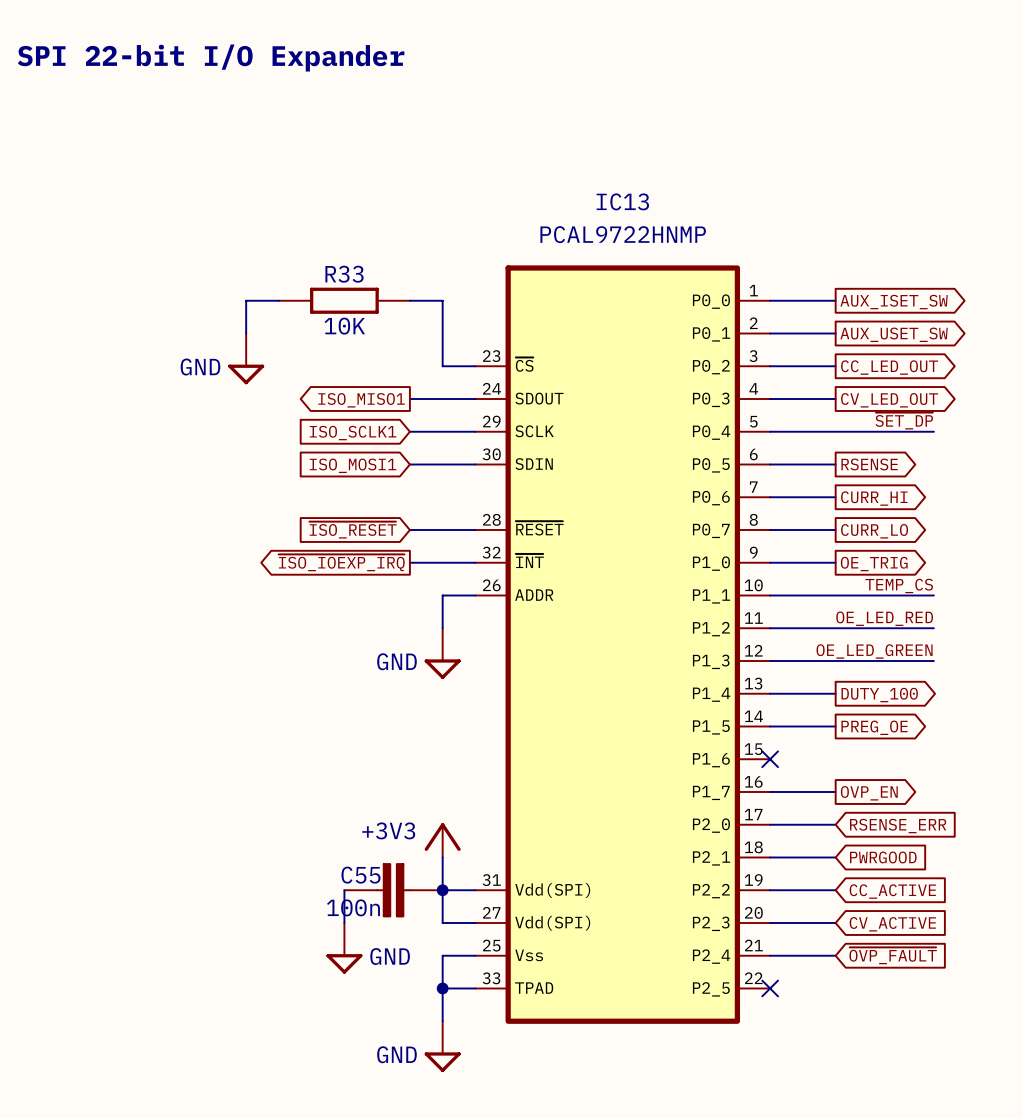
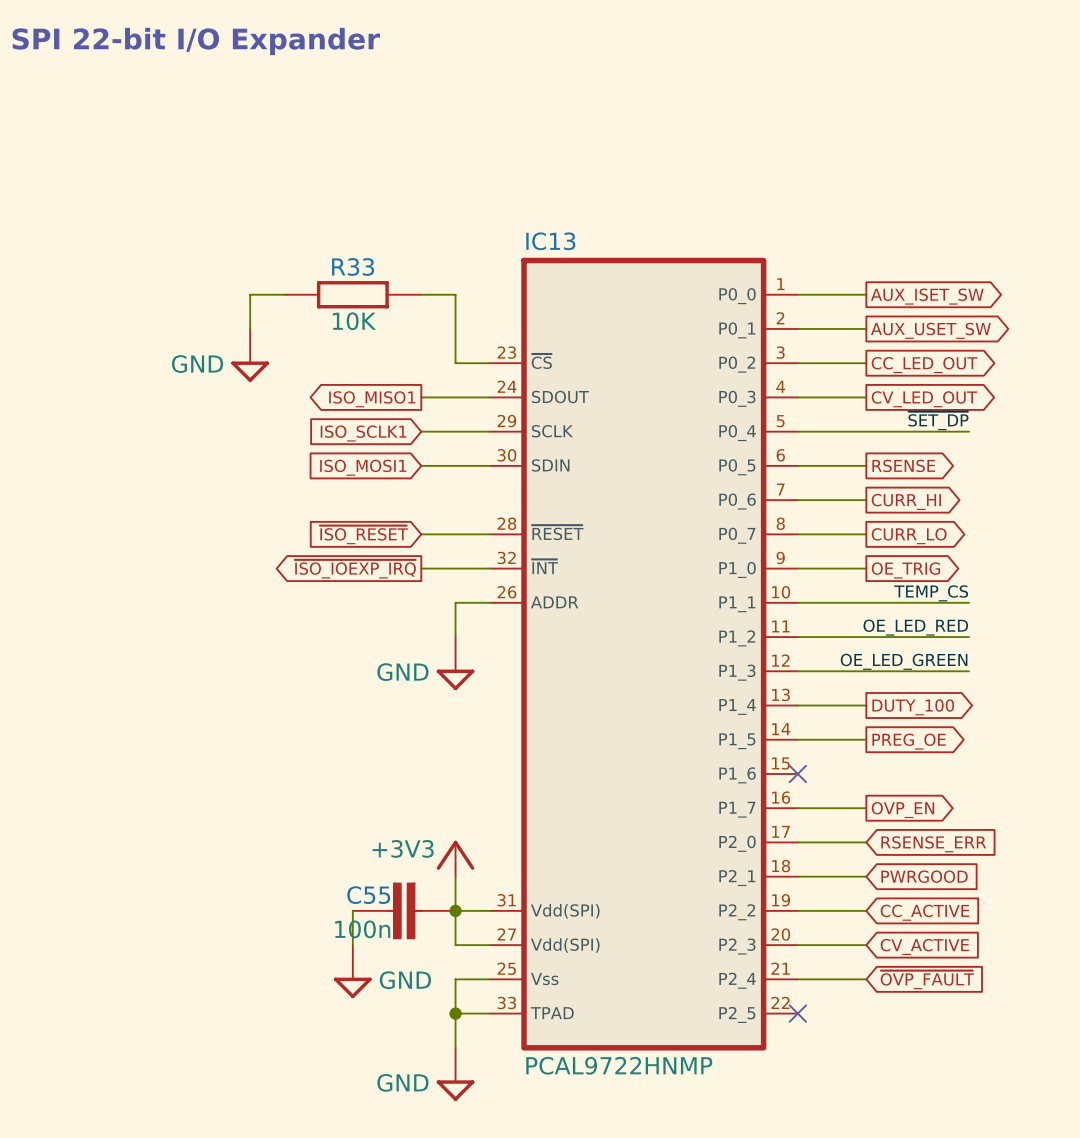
IC13 name position: IC13 (622, 201) -> IC13 (550, 241)
IC13 value position: PCAL9722HNMP (623, 234) -> PCAL9722HNMP (619, 1065)

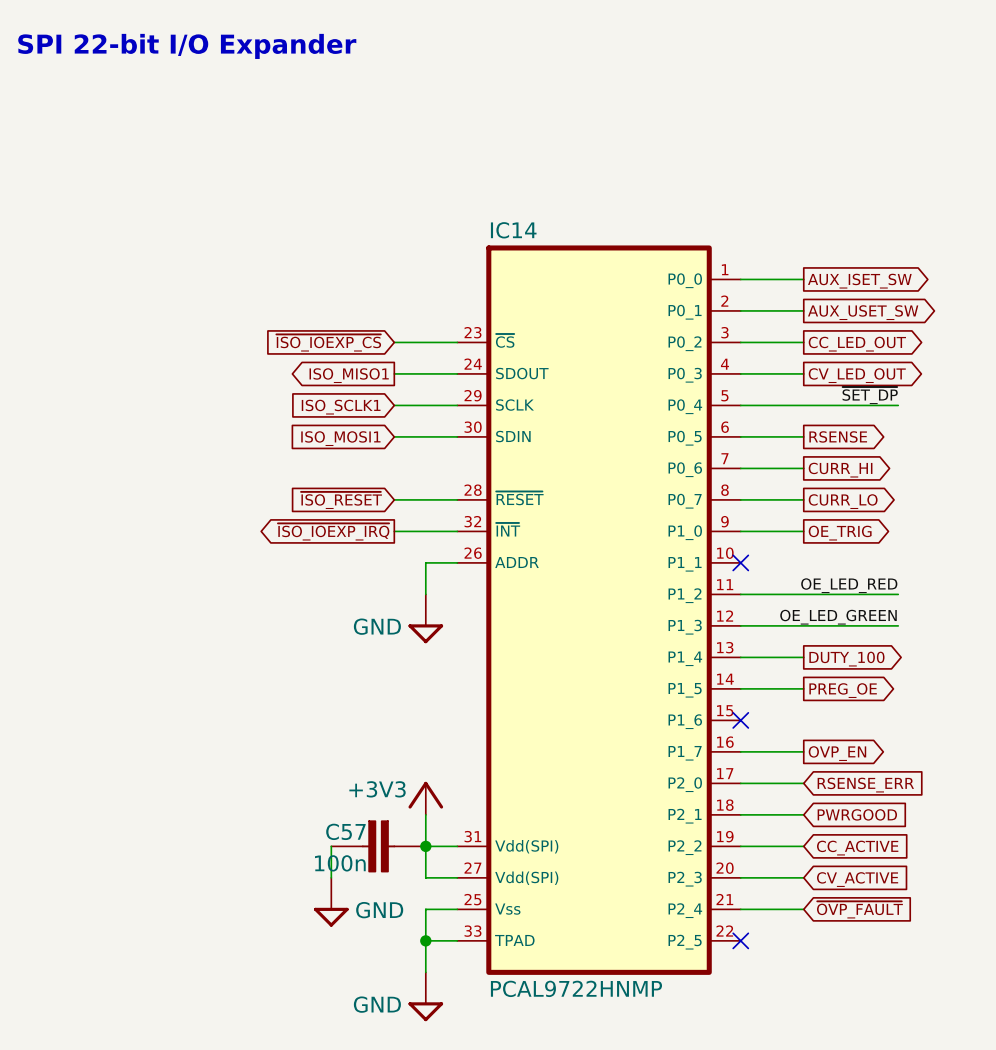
IC13 name: IC13 (550, 241) -> IC14 (513, 230)
wire: (284, 294) (250, 294) (250, 328) -> none
R33: 10K (352, 294) -> none
wire: (421, 294) (455, 294) (455, 363) -> (394, 342) (425, 342)
power symbol: GND (250, 355) -> none
global label: none -> ~{ISO_IOEXP_CS} (328, 342)
label: TEMP_CS (931, 593) -> none
wire: (797, 602) (969, 602) -> none
no-connect mark: none -> (740, 562)
C55 name: C55 (368, 895) -> C57 (345, 831)

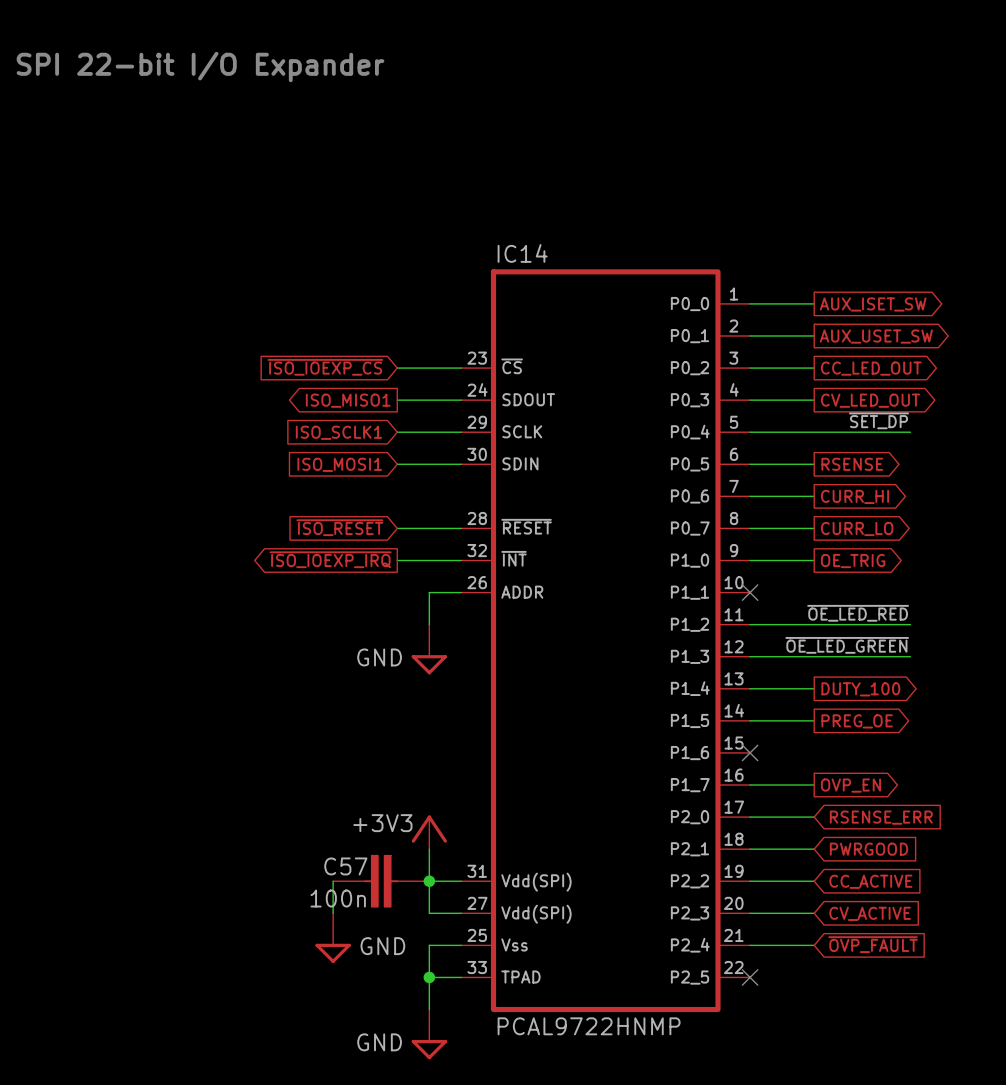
label: OE_LED_RED (849, 585) -> ~{OE_LED_RED} (858, 613)
label: OE_LED_GREEN (838, 617) -> ~{OE_LED_GREEN} (847, 645)

